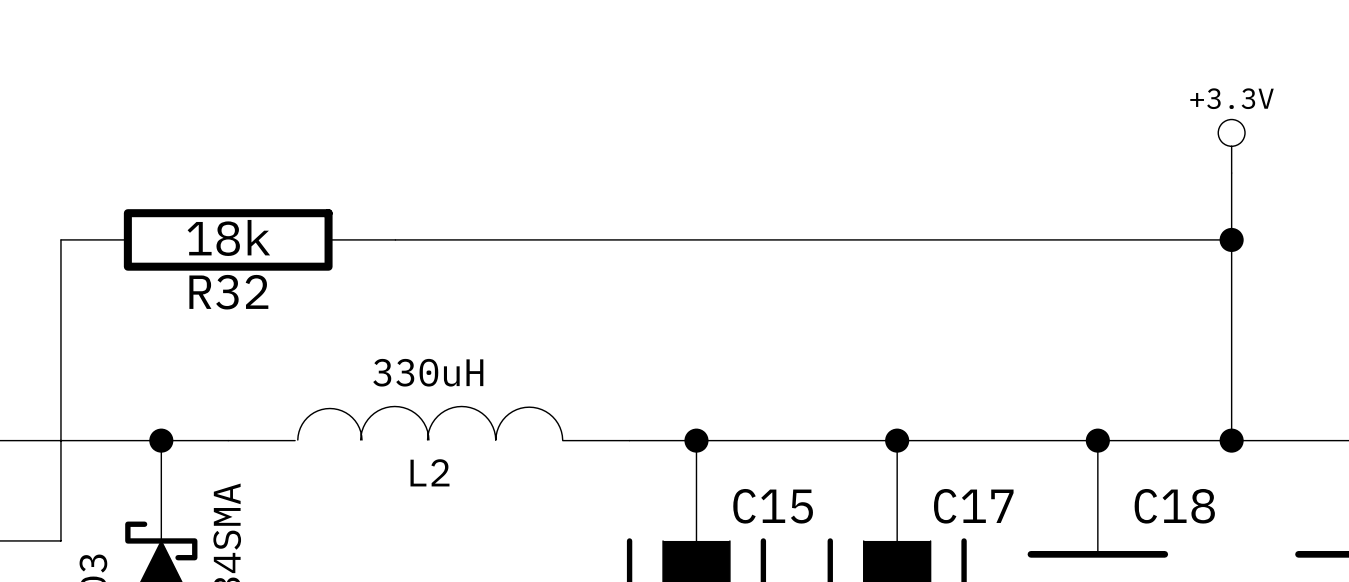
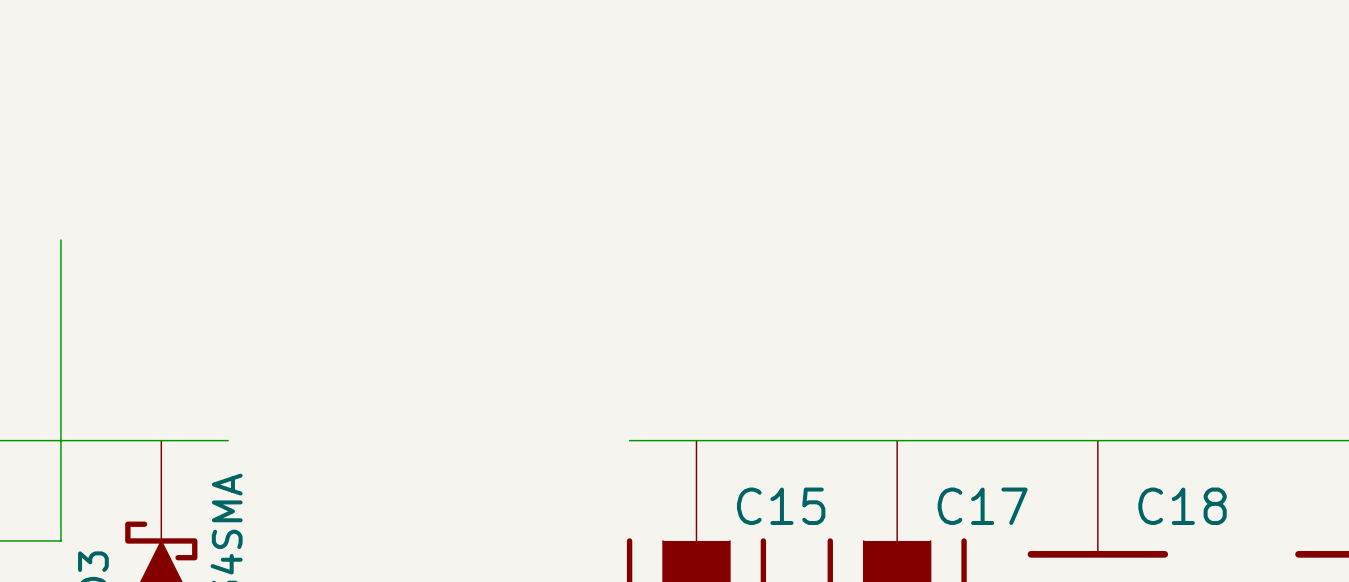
power symbol: +3.3V (1231, 146) -> none
wire: (1231, 173) (1231, 440) -> none
R32: 18k (228, 239) -> none
wire: (395, 239) (1231, 239) -> none
junction: (1231, 239) -> none
L2: 330uH (428, 423) -> none
junction: (161, 440) -> none
junction: (696, 440) -> none
junction: (897, 440) -> none
junction: (1097, 440) -> none
junction: (1231, 440) -> none

